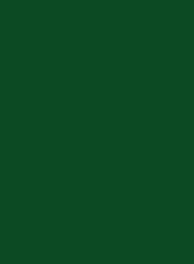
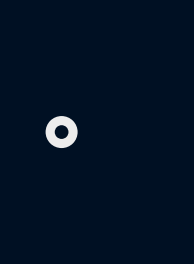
via: none -> (61, 132)

